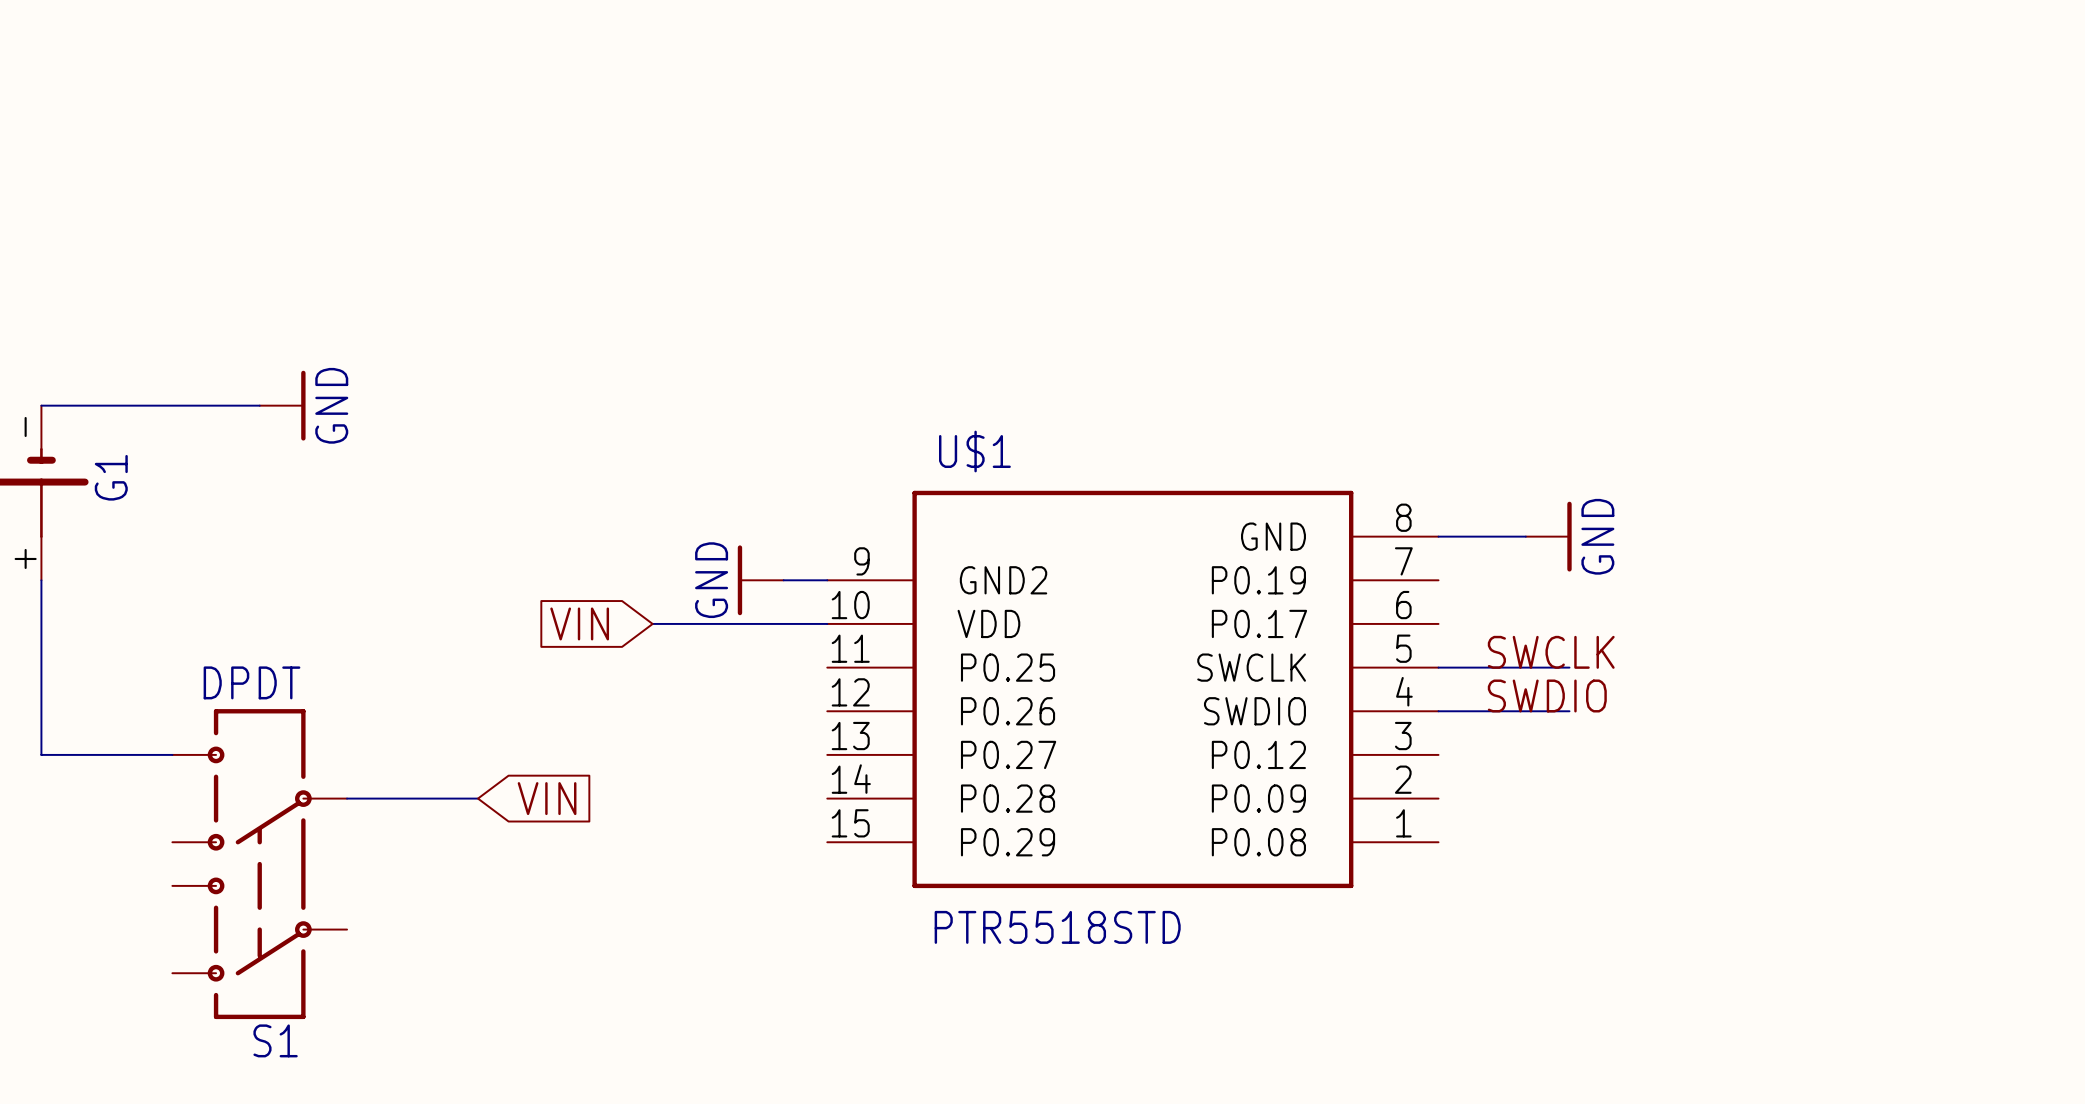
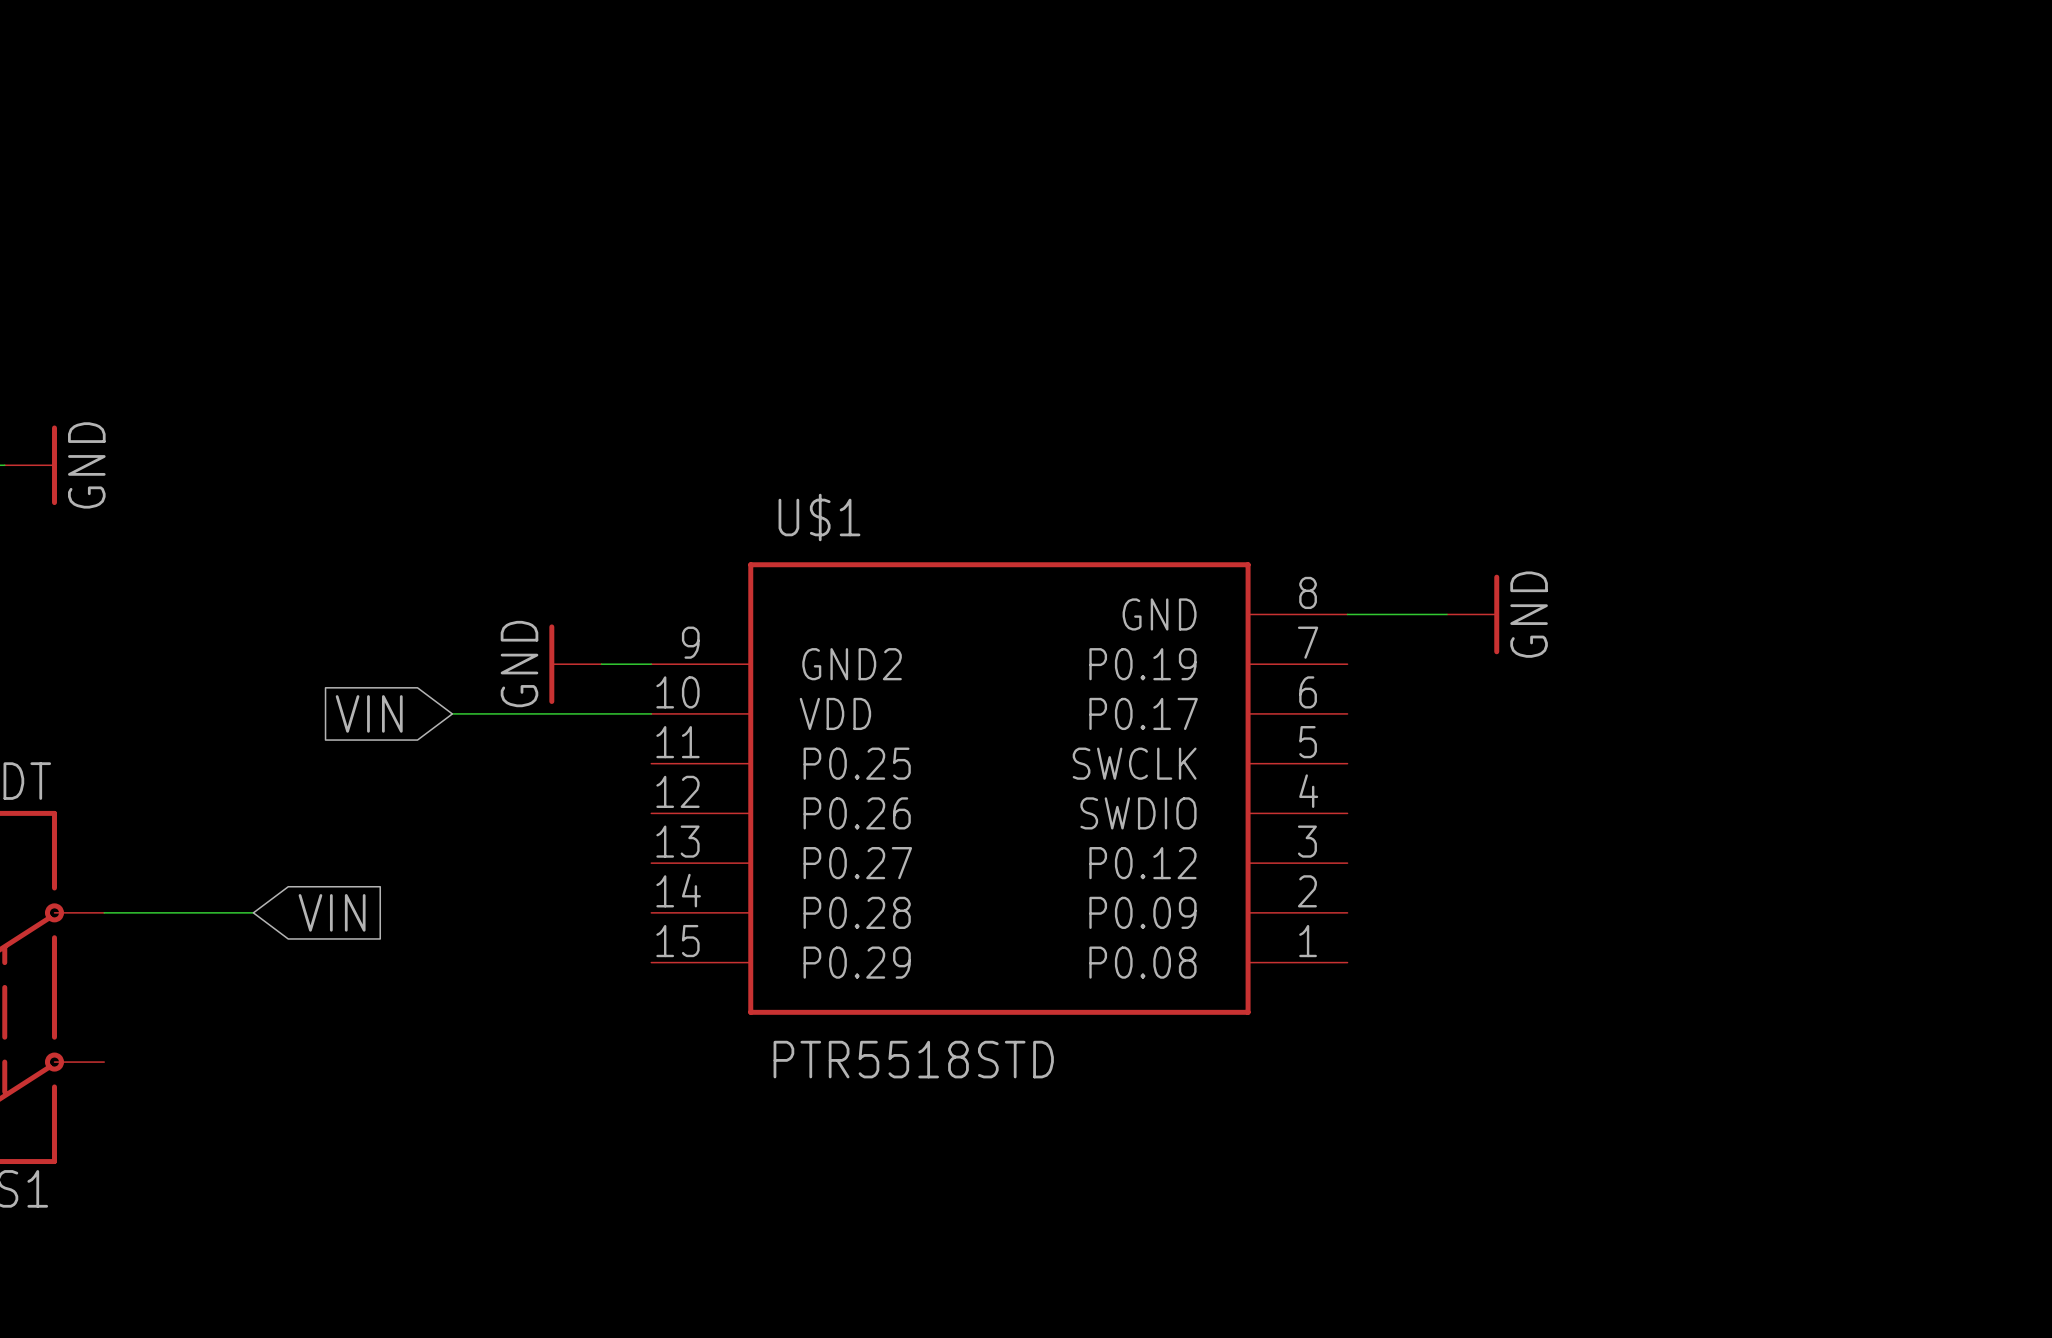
label: SWCLK (1551, 652) -> none
wire: (1438, 667) (1569, 667) -> none
label: SWDIO (1547, 695) -> none
wire: (1438, 711) (1569, 711) -> none

